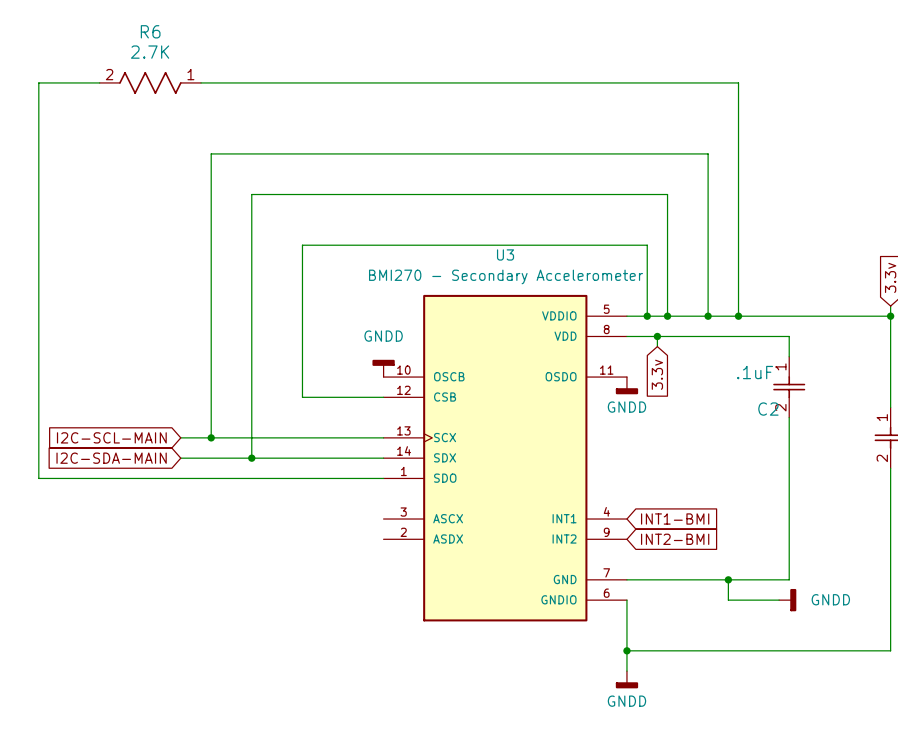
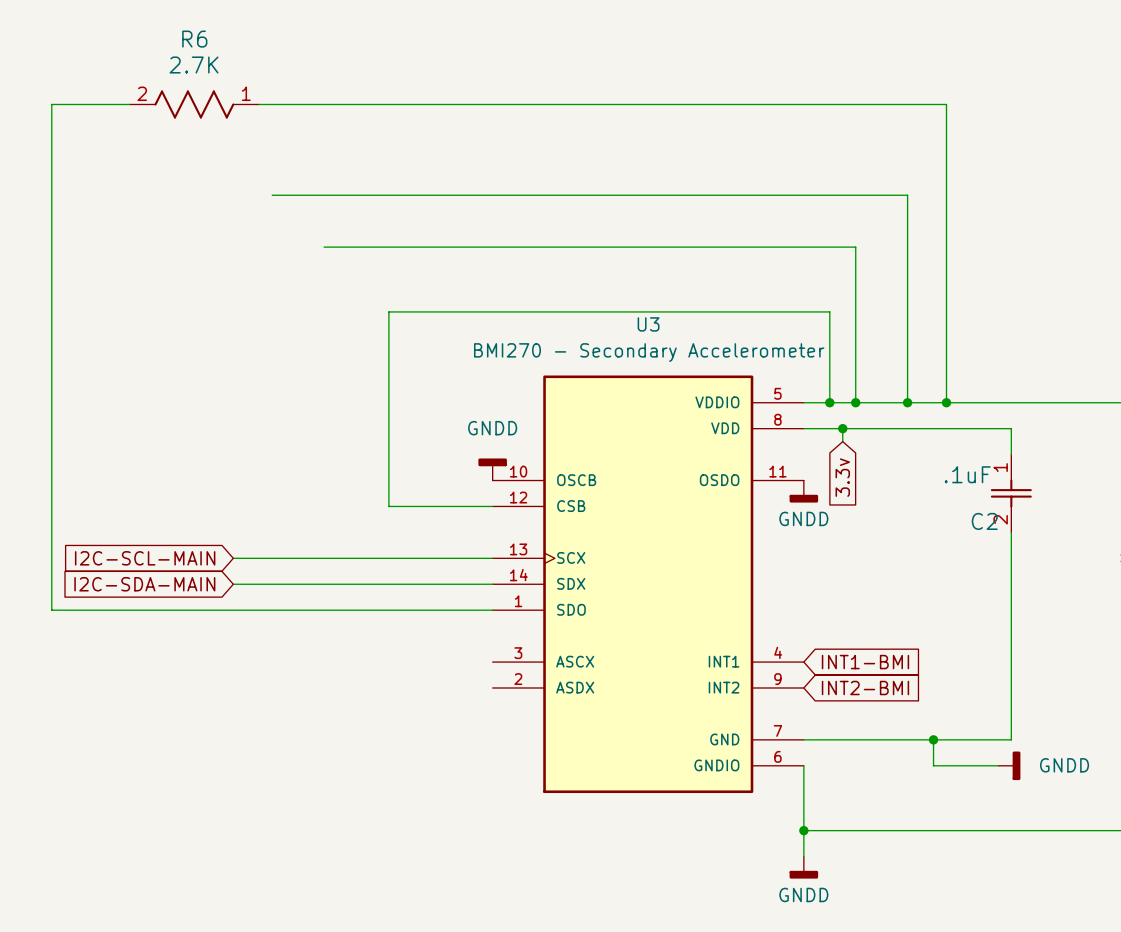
wire: (211, 153) (211, 437) -> none
wire: (251, 194) (251, 458) -> none
junction: (211, 437) -> none
junction: (251, 458) -> none

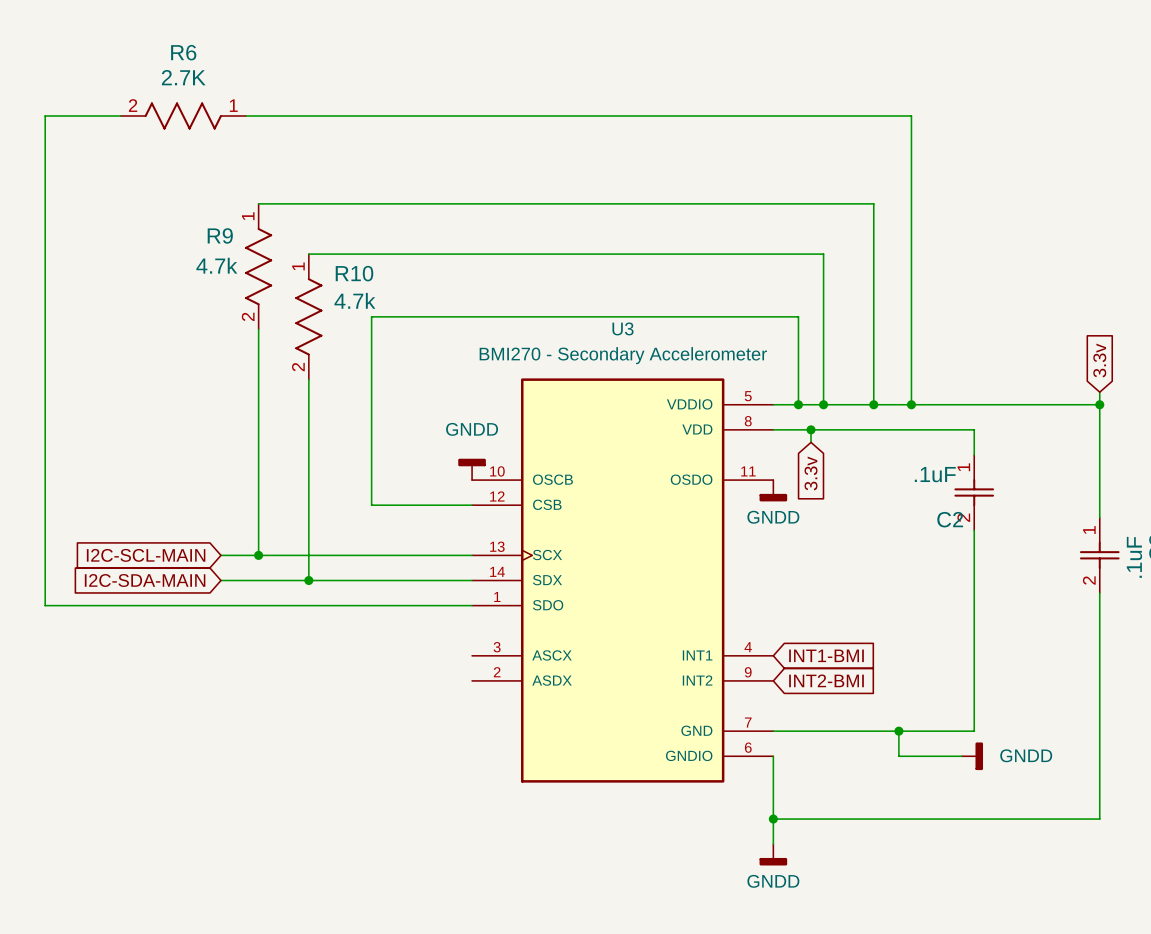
R9: none -> 4.7k (258, 266)
R10: none -> 4.7k (308, 316)
wire: none -> (258, 329) (258, 555)
wire: none -> (308, 379) (308, 580)
junction: none -> (258, 555)
junction: none -> (308, 580)

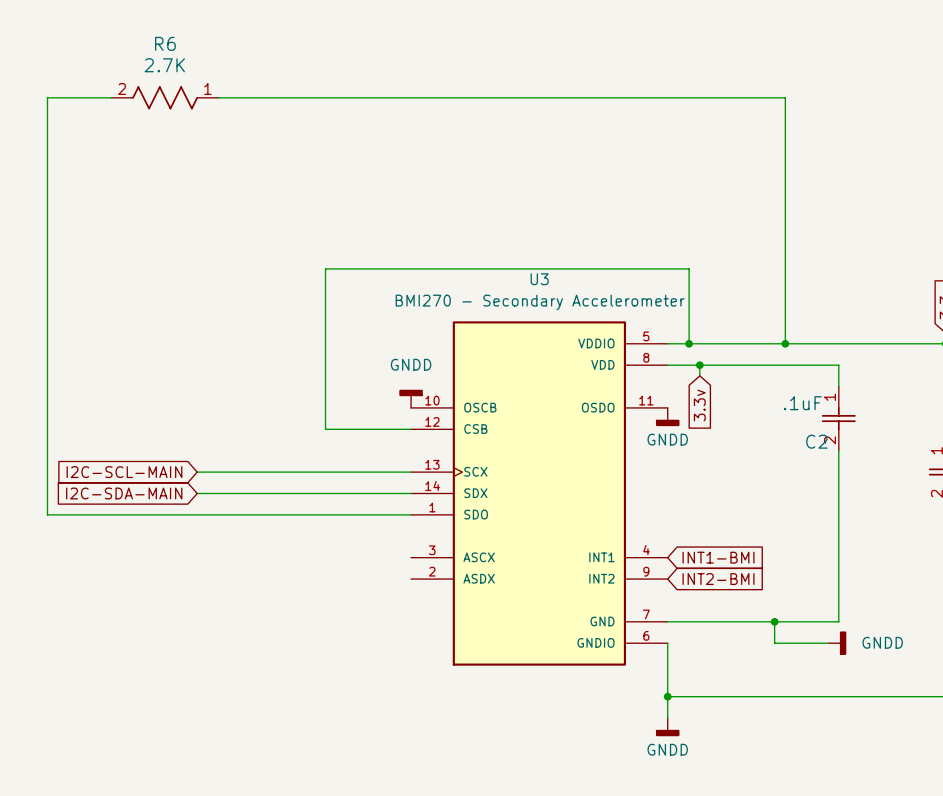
wire: (258, 203) (873, 203) (873, 404) -> none
wire: (308, 254) (823, 254) (823, 404) -> none
R9: 4.7k (258, 266) -> none
R10: 4.7k (308, 316) -> none
wire: (258, 329) (258, 555) -> none
wire: (308, 379) (308, 580) -> none
junction: (823, 404) -> none
junction: (873, 404) -> none
junction: (258, 555) -> none
junction: (308, 580) -> none

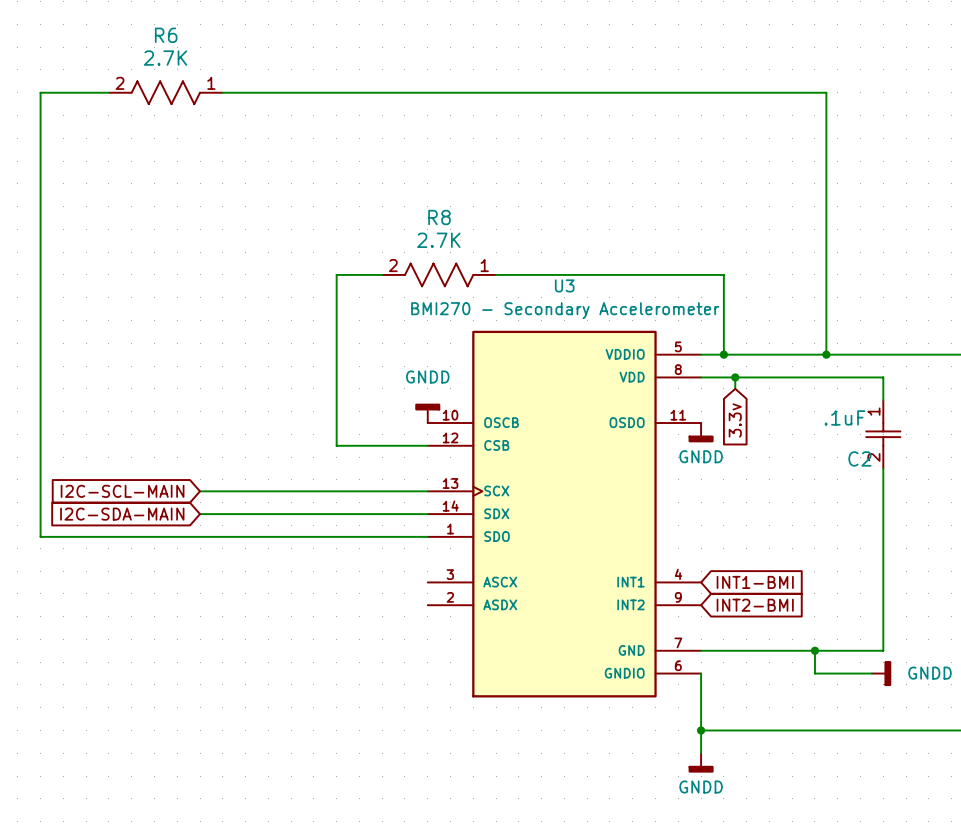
wire: (368, 268) (475, 268) -> none
R8: none -> 2.7K (439, 274)

